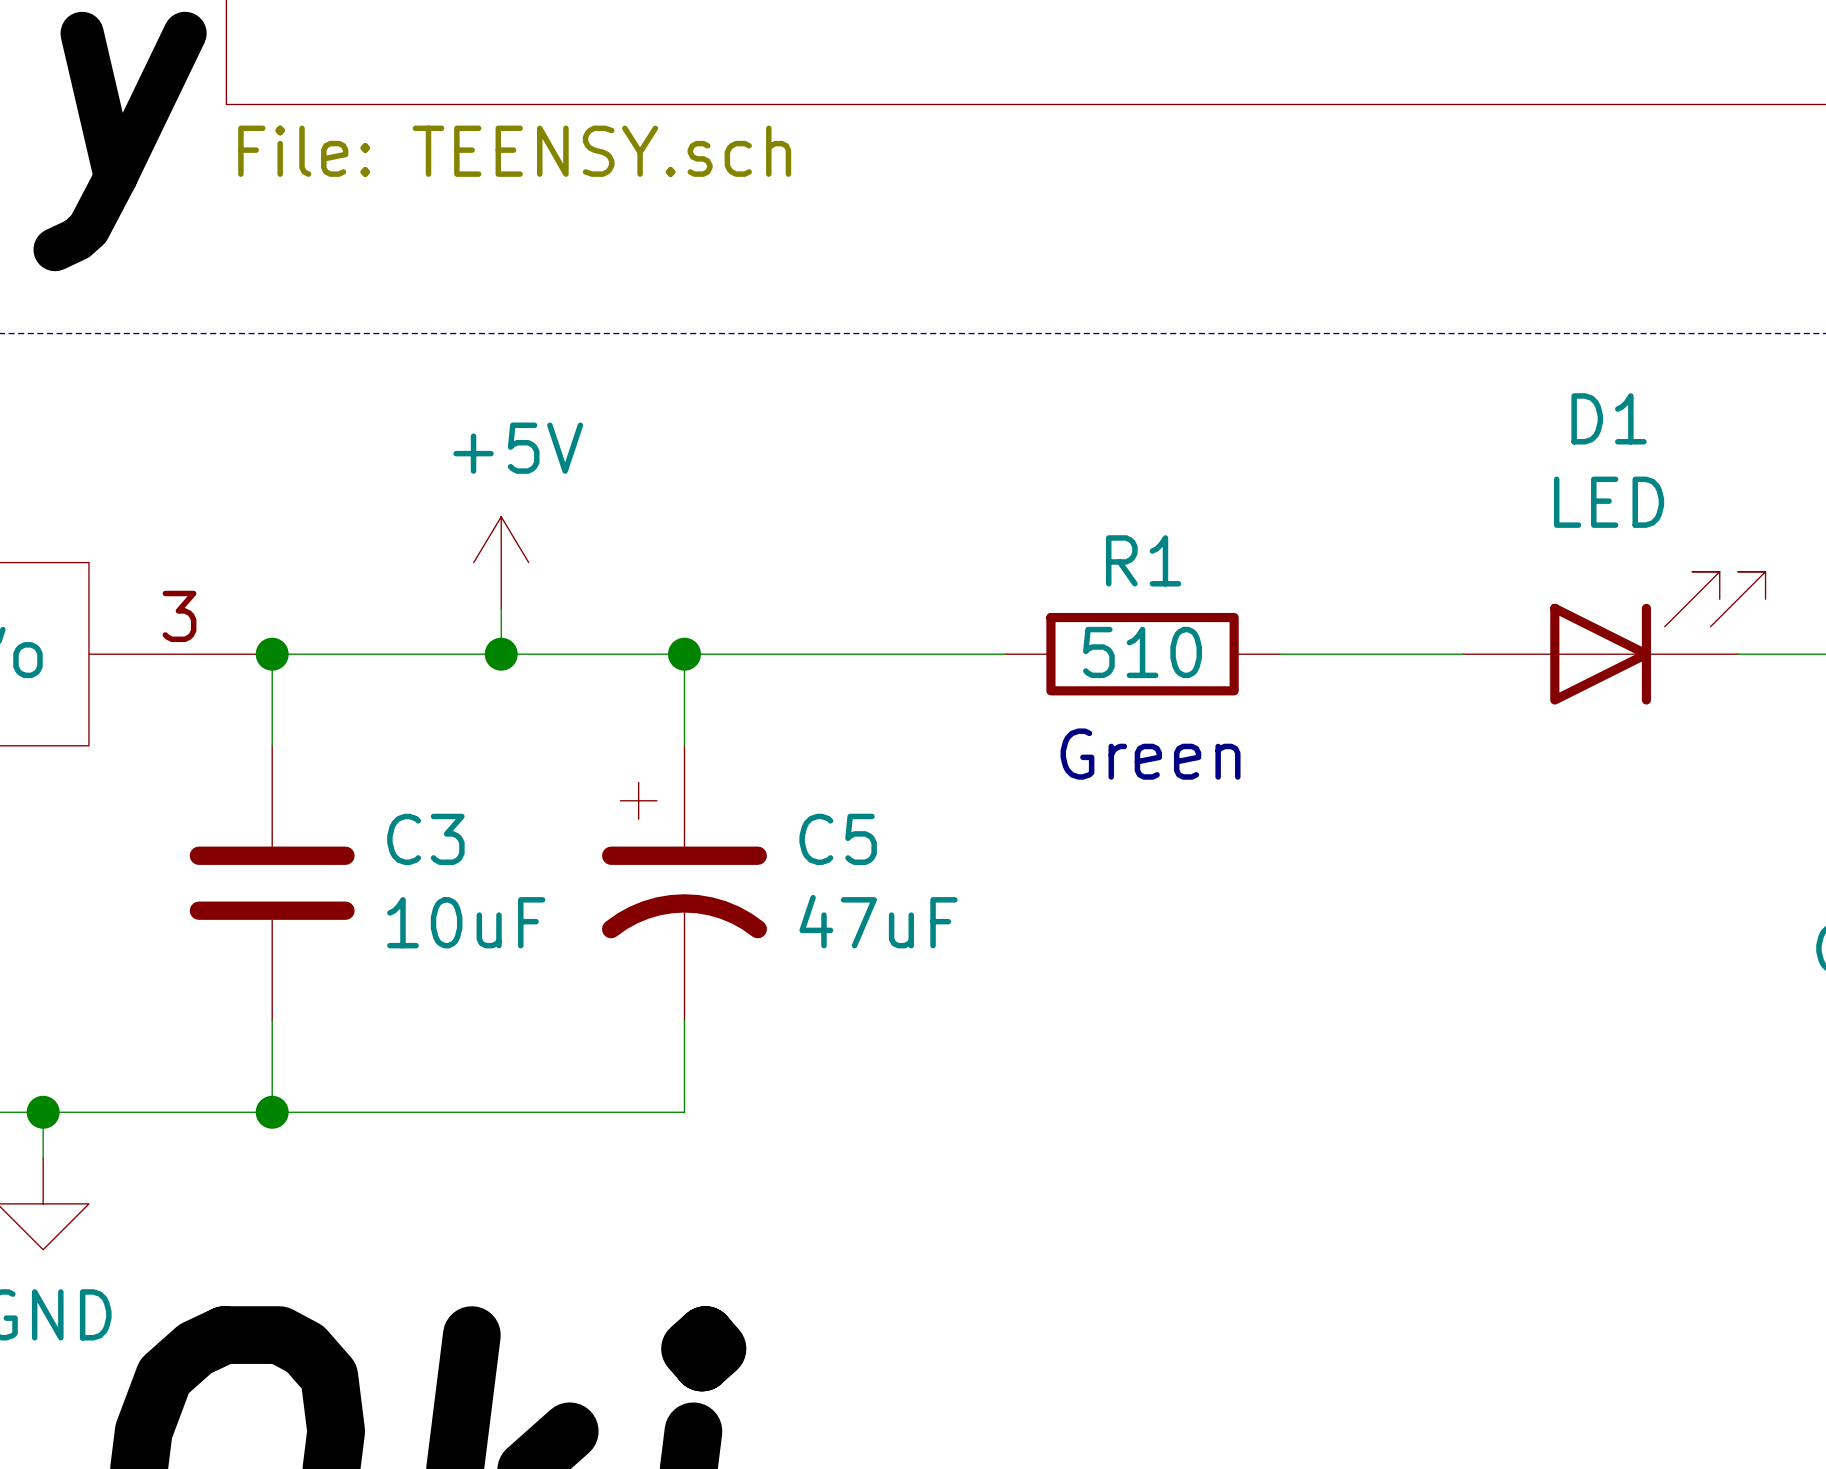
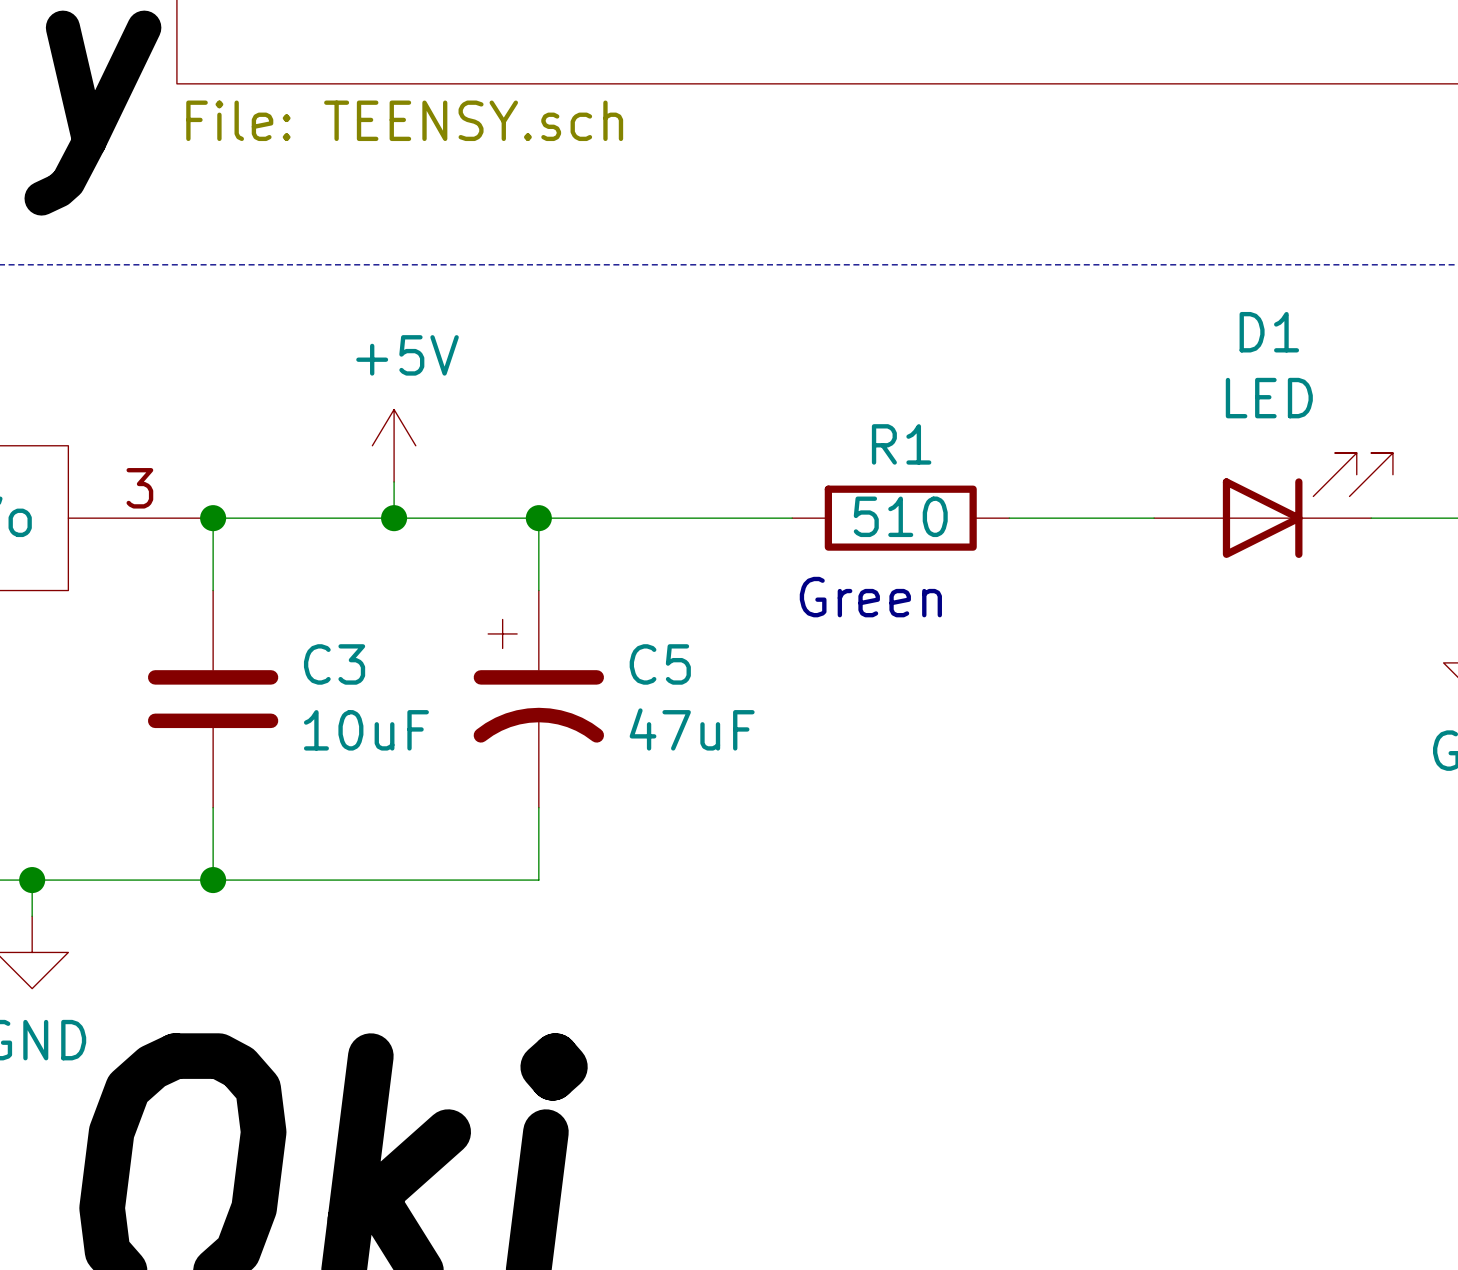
text position: Green (1150, 754) -> Green (870, 597)

